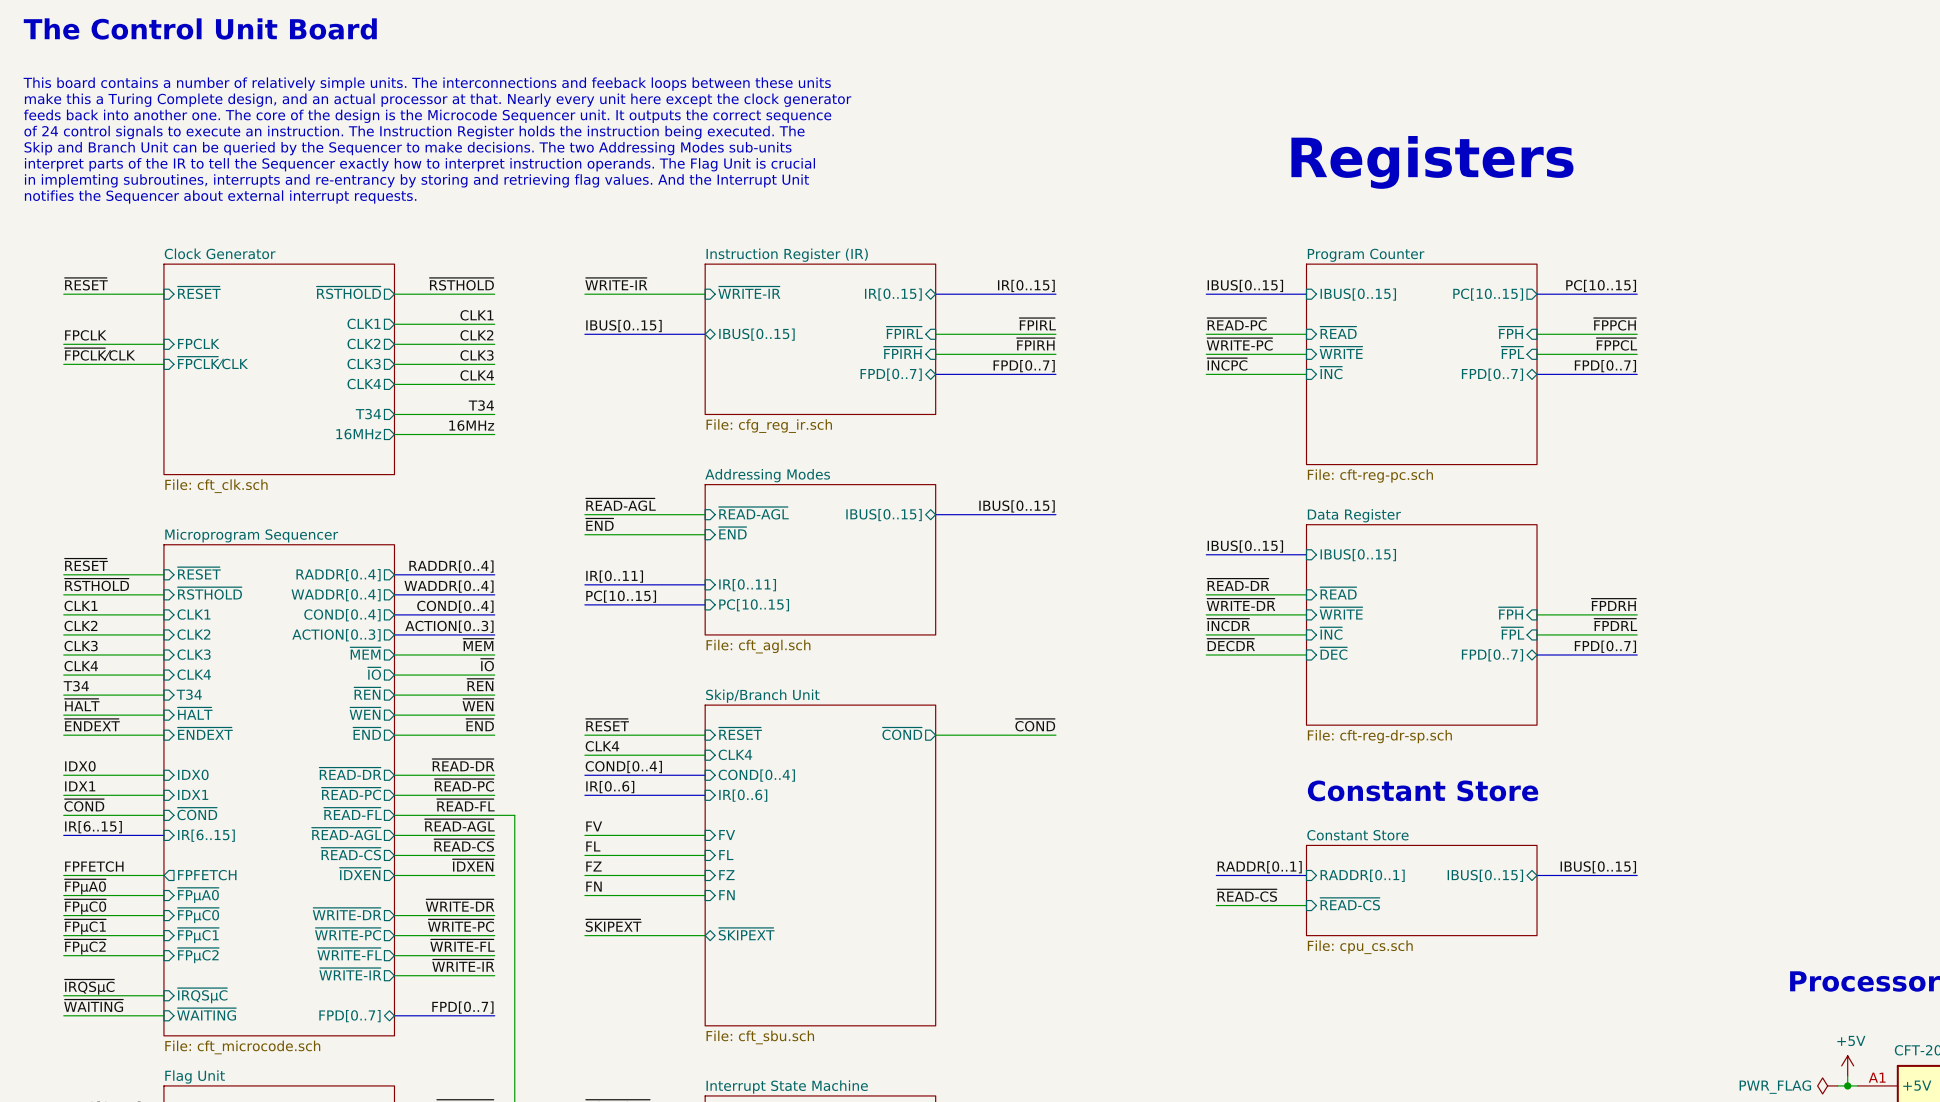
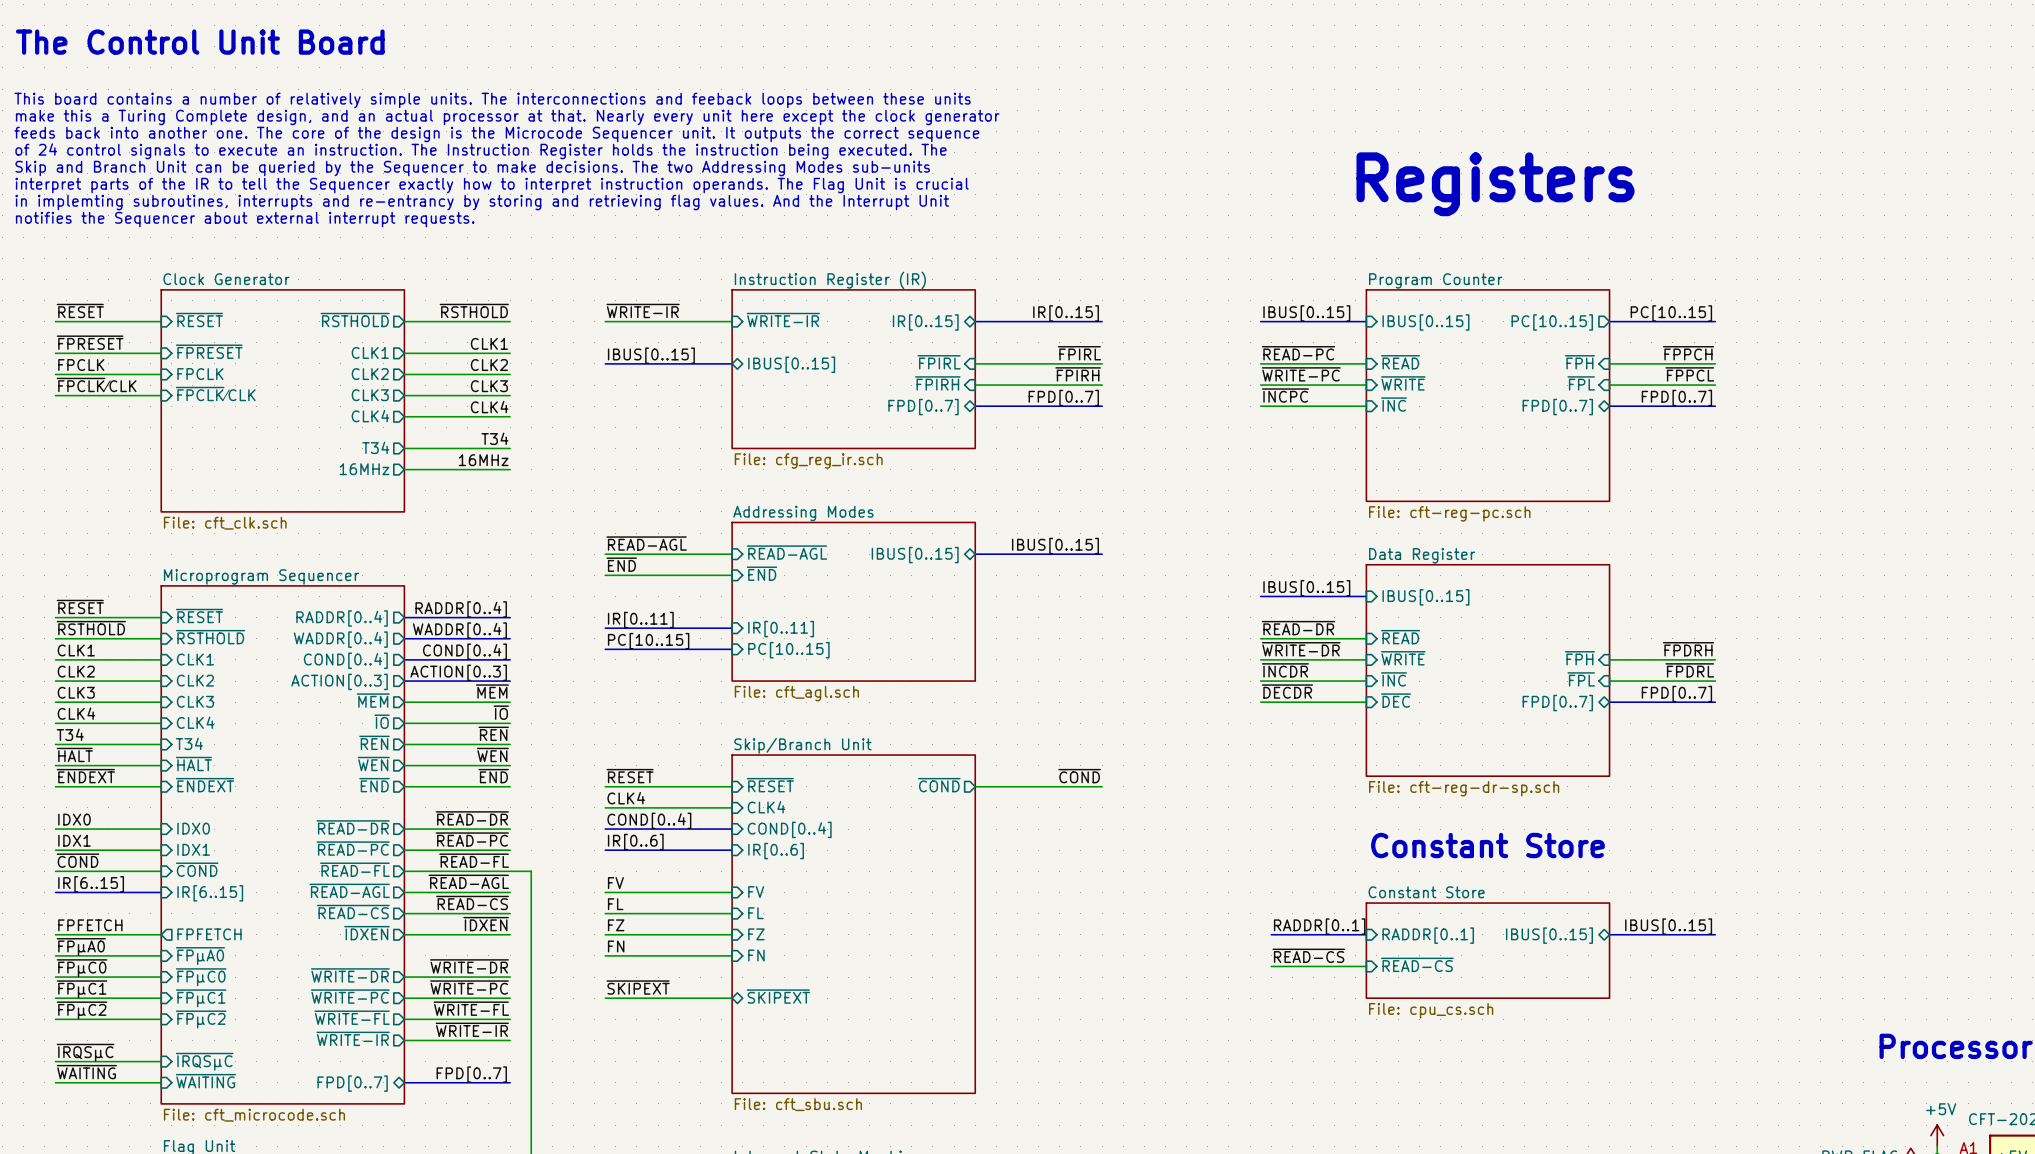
label: none -> ~{FPRESET} (90, 342)
sheet pin: none -> ~{FPRESET} (209, 351)
wire: none -> (55, 353) (161, 353)

